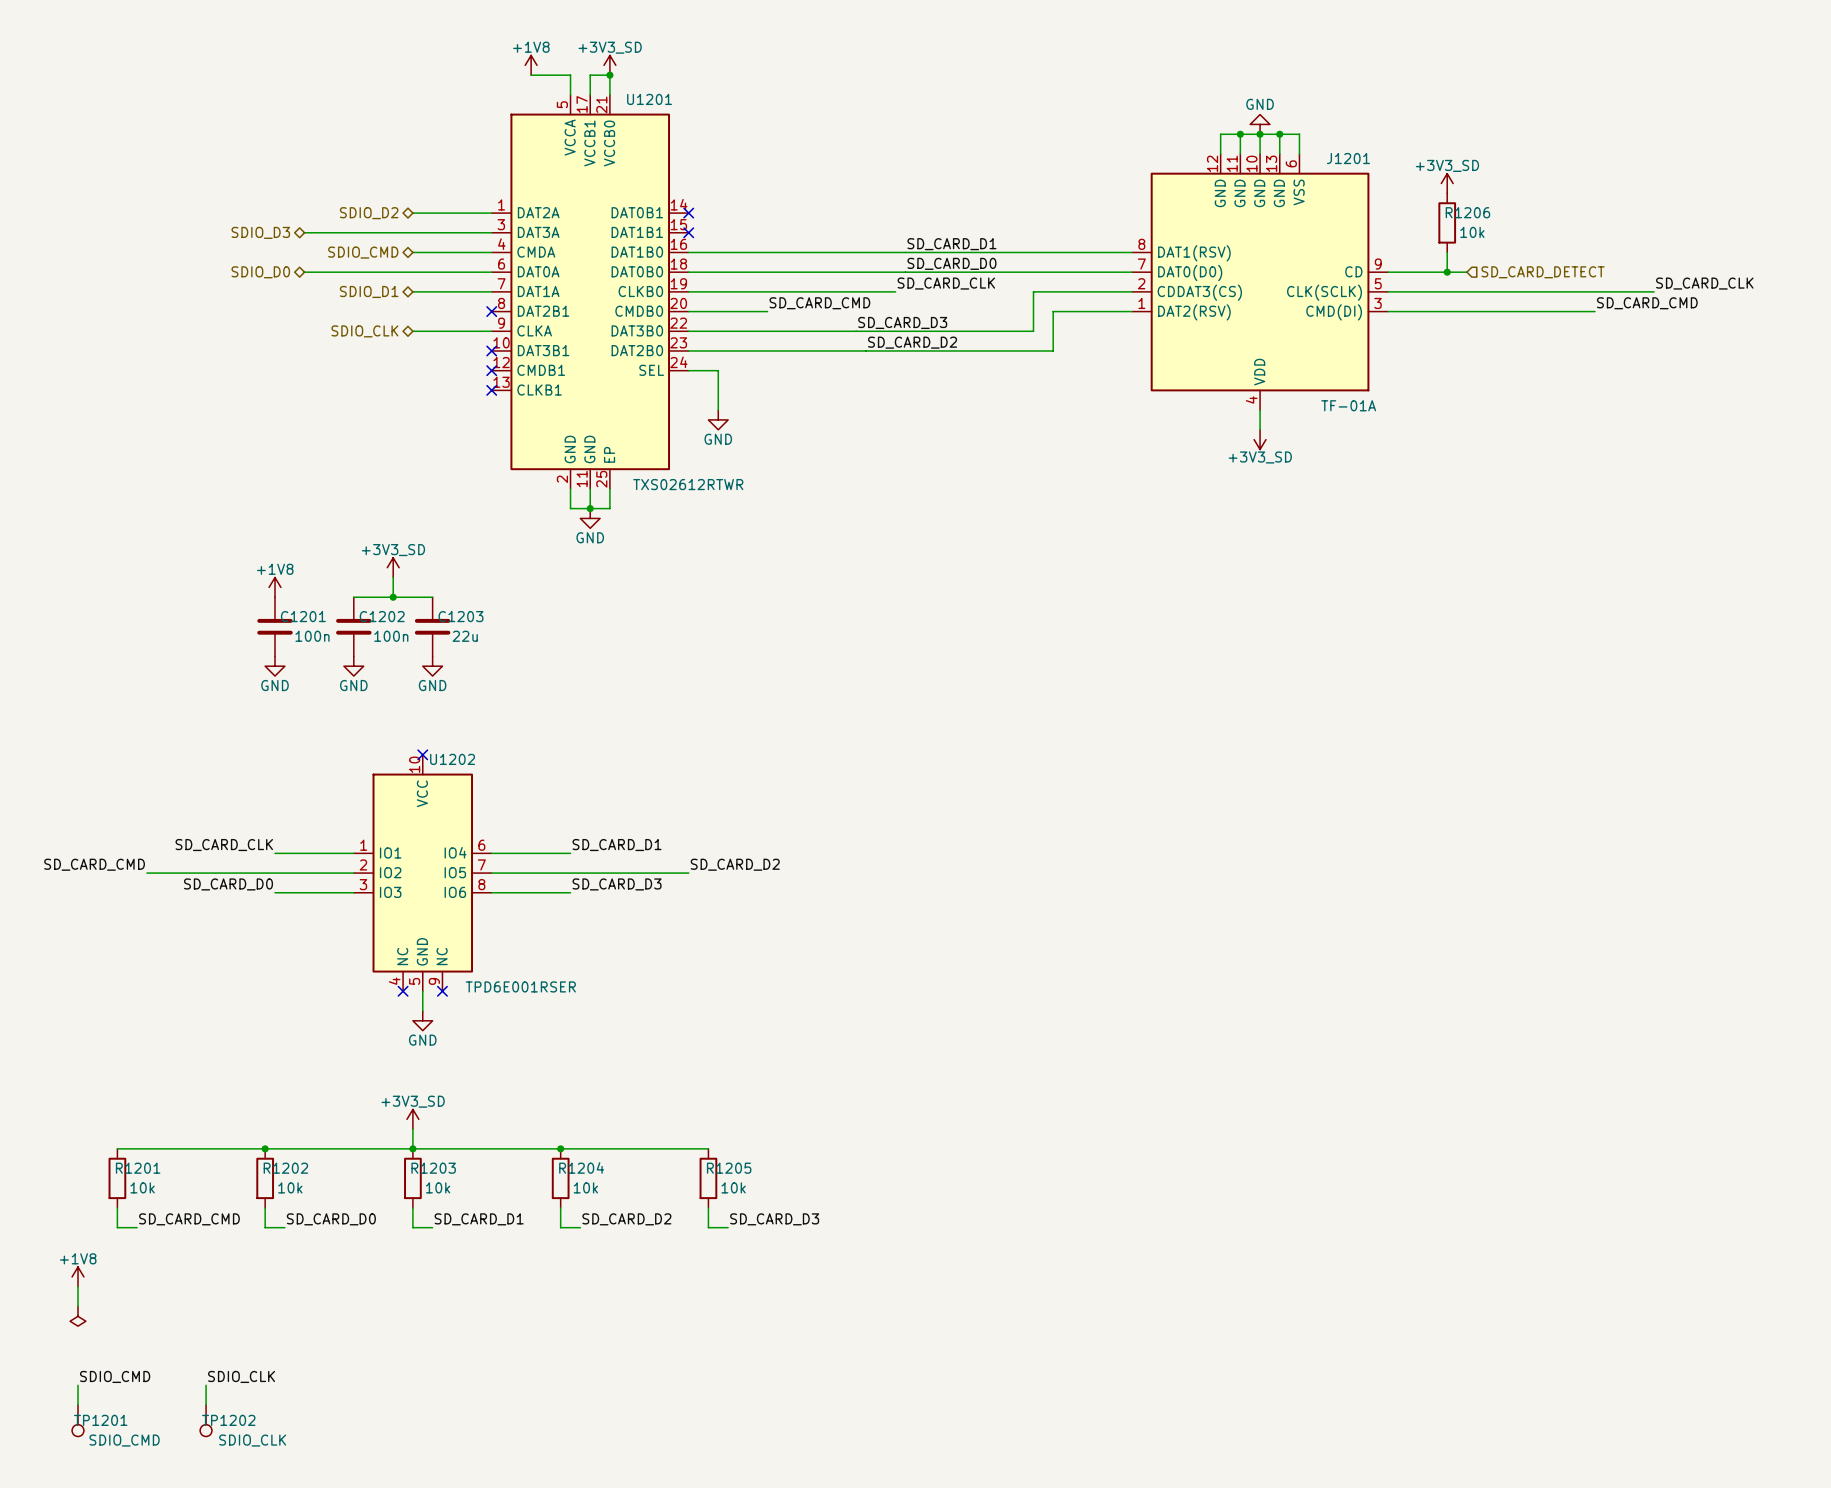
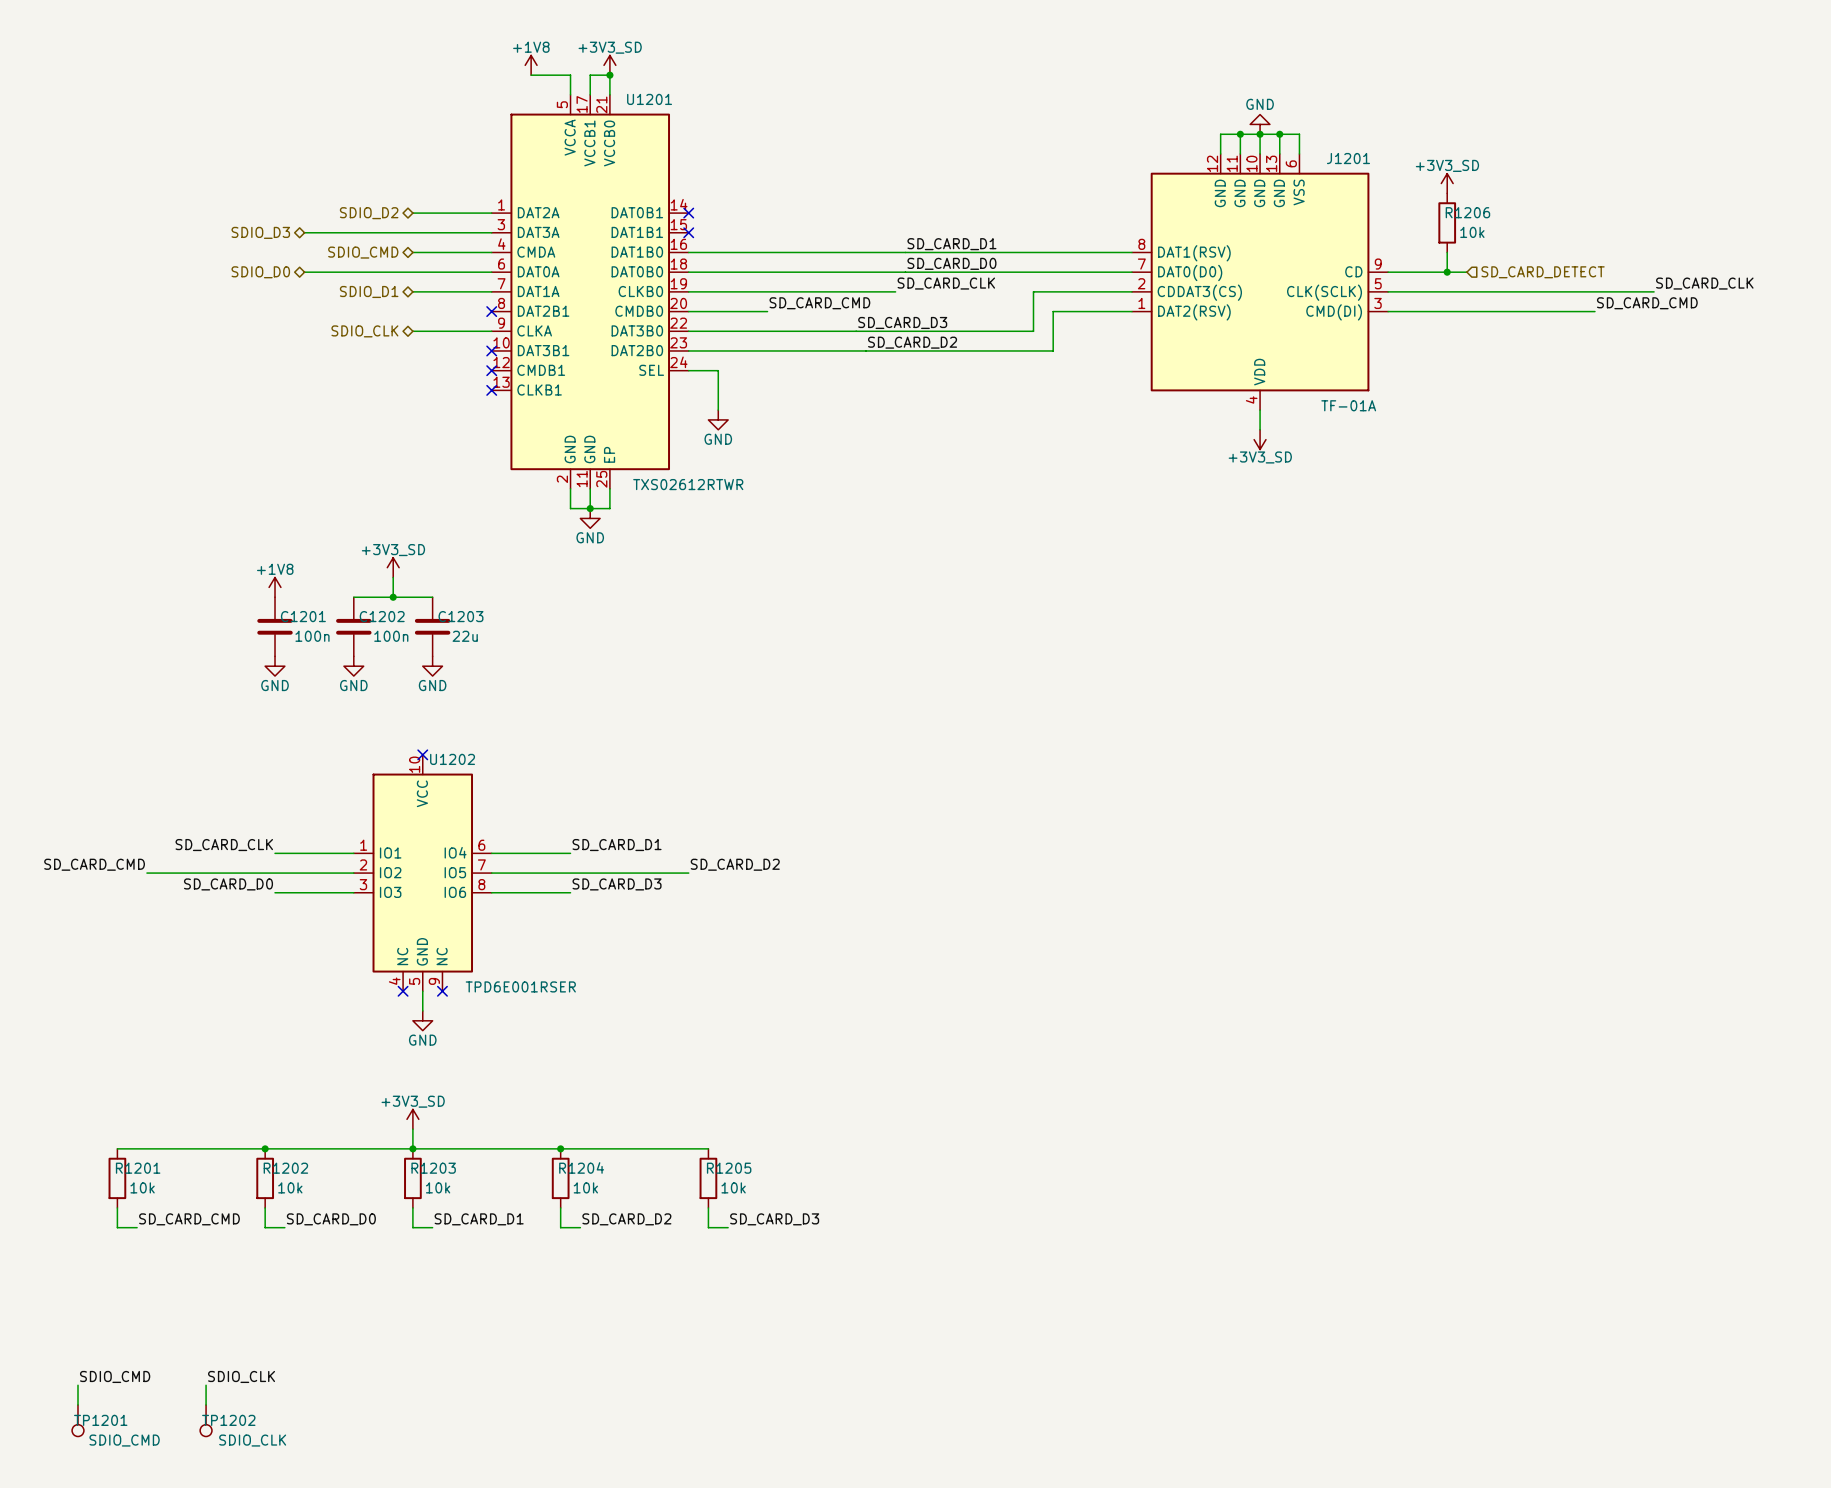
power symbol: +1V8 (78, 1276) -> none
wire: (78, 1286) (78, 1306) -> none
power symbol: (78, 1316) -> none

